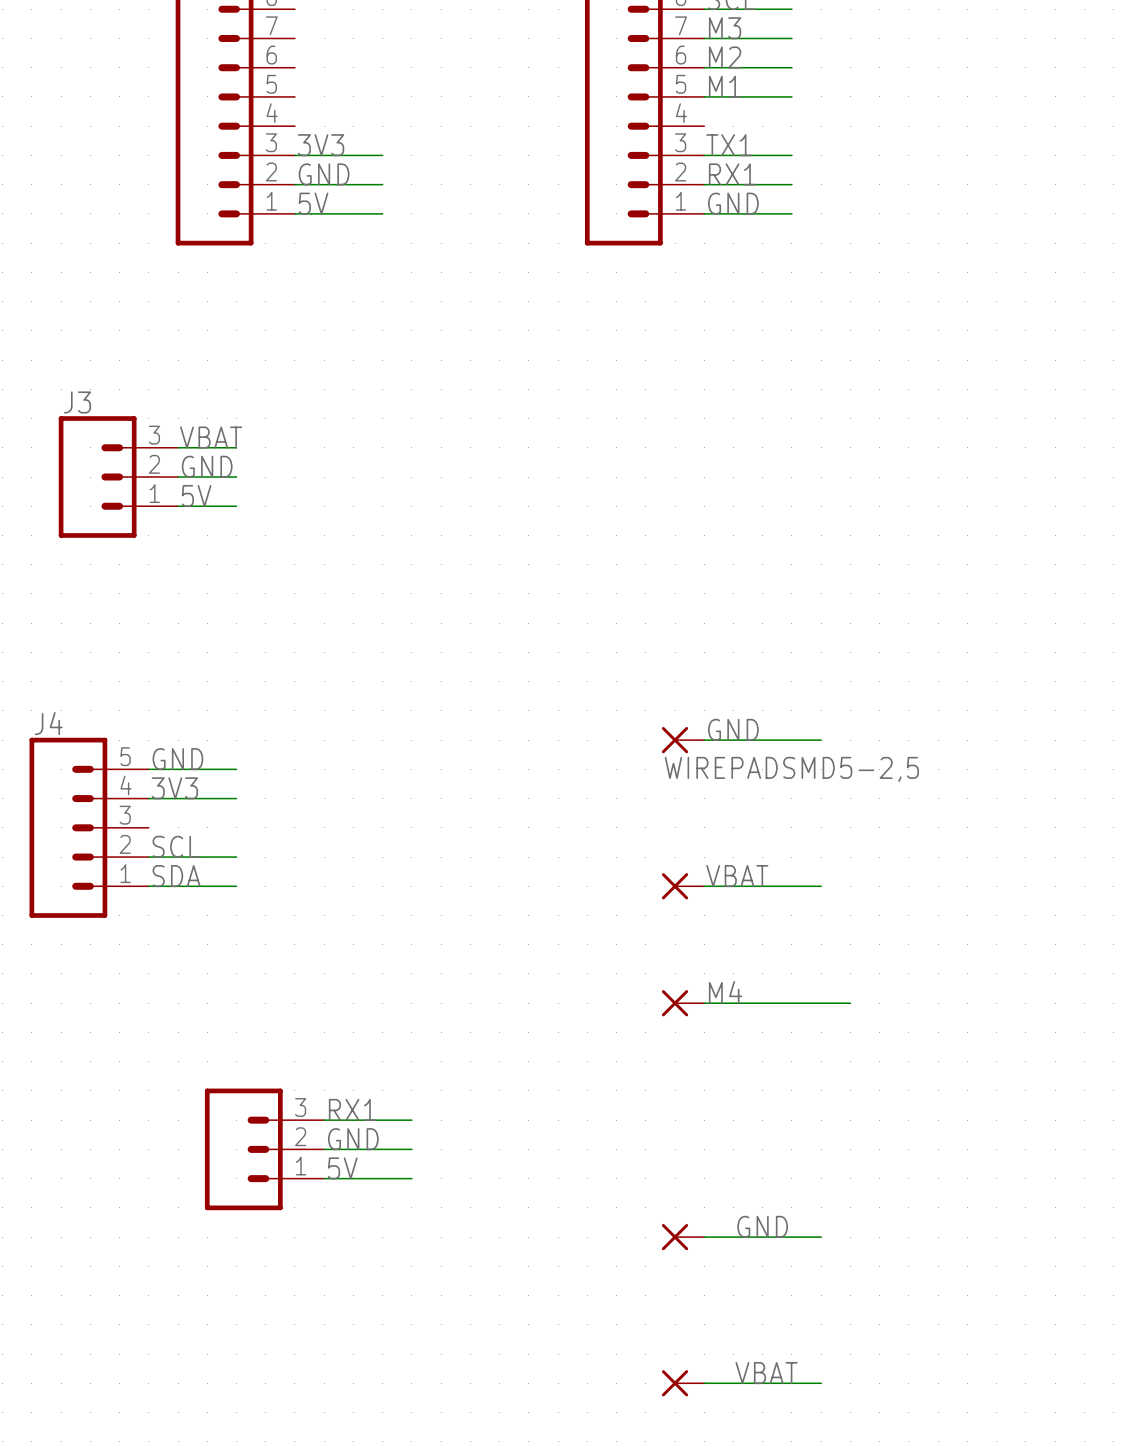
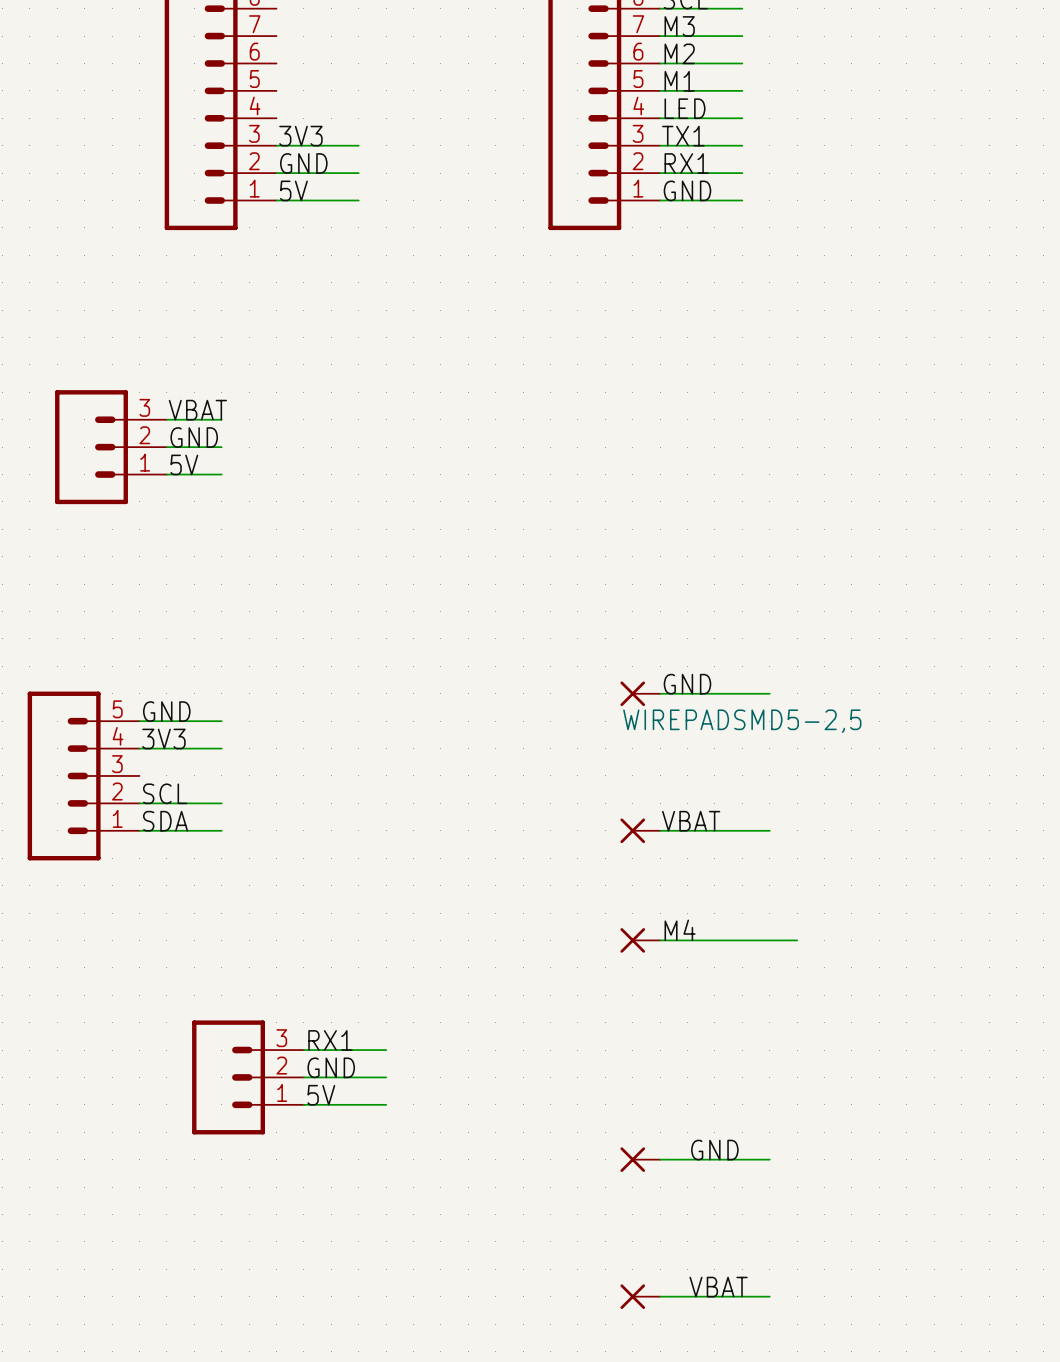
label: none -> LED (685, 108)
wire: none -> (660, 118) (742, 118)
J3 name: J3 (77, 402) -> none
J4 name: J4 (48, 723) -> none

